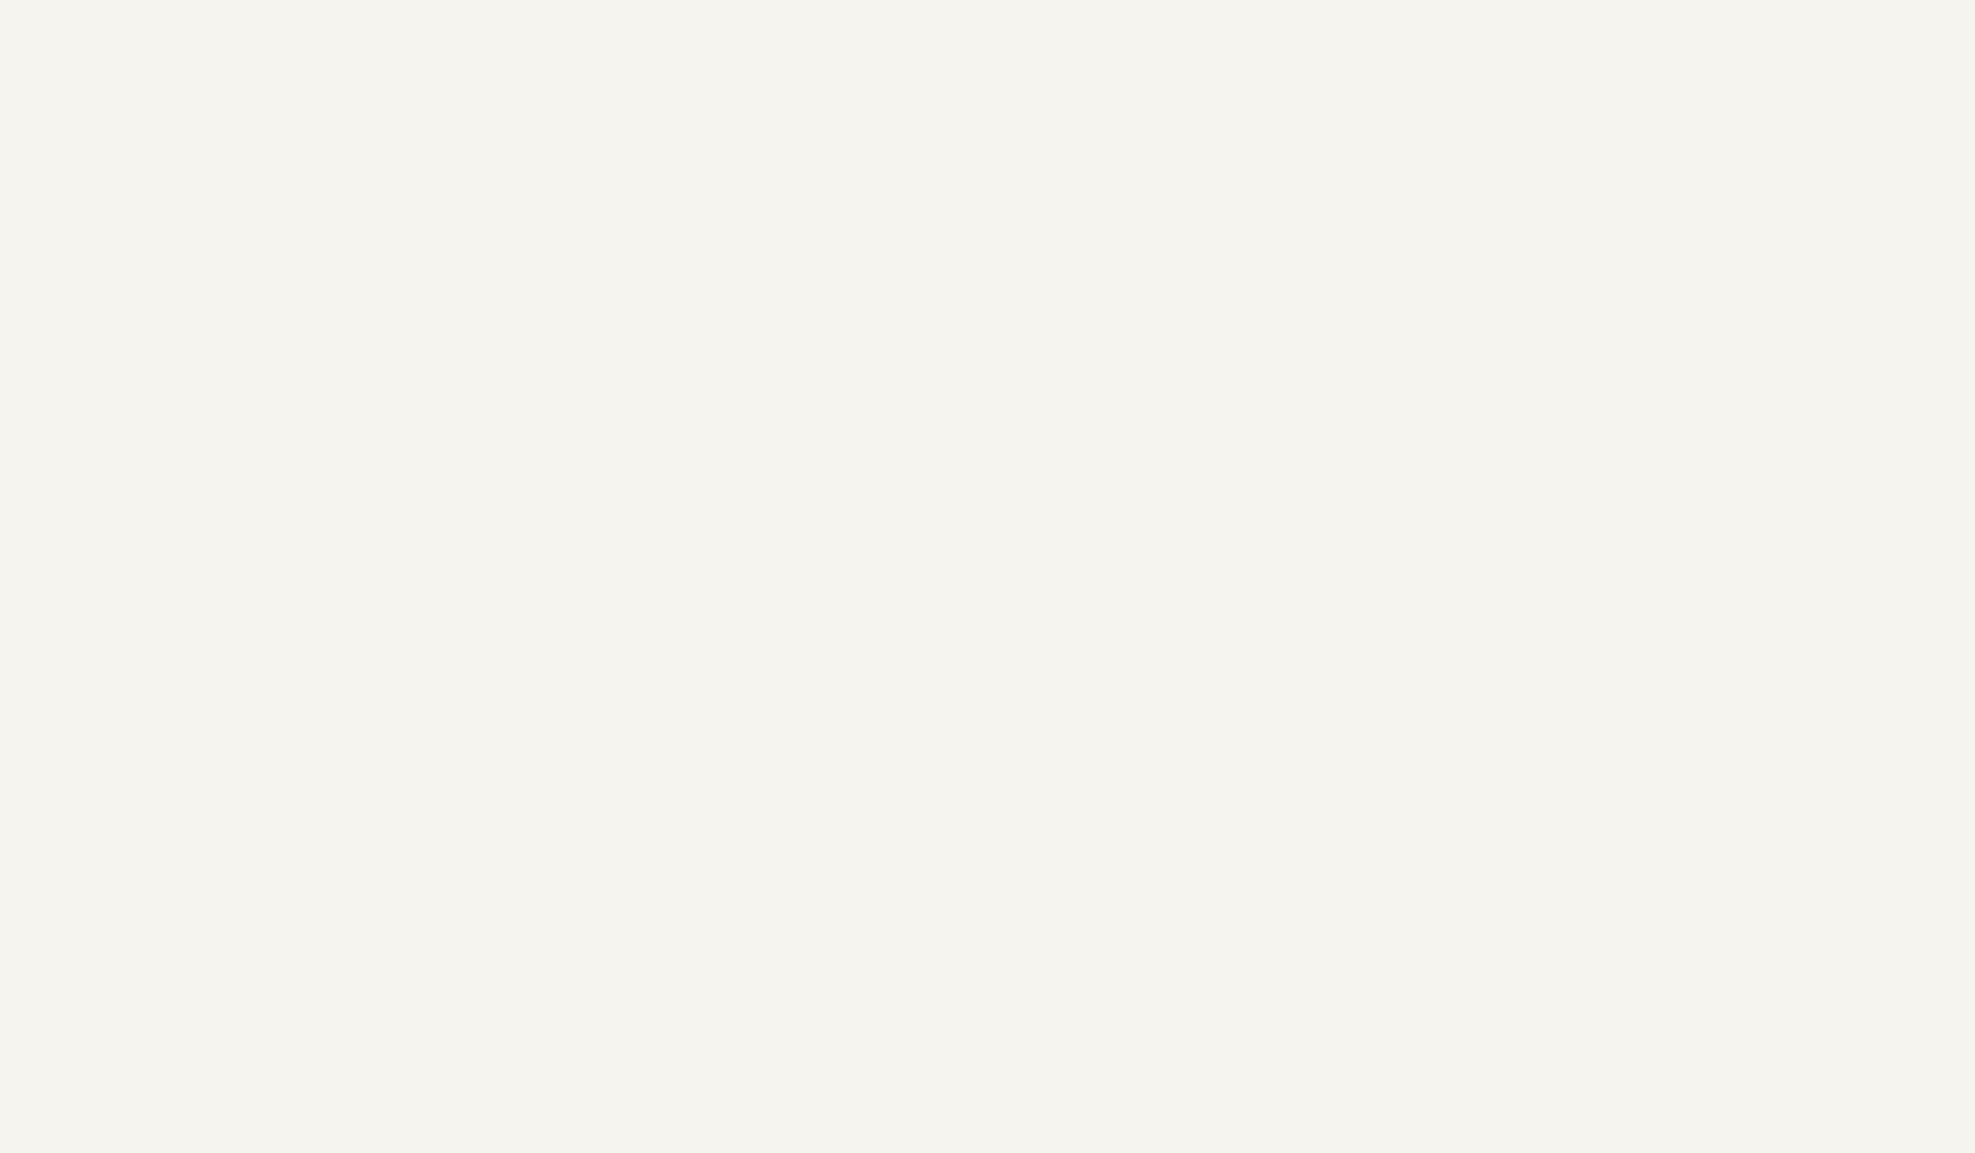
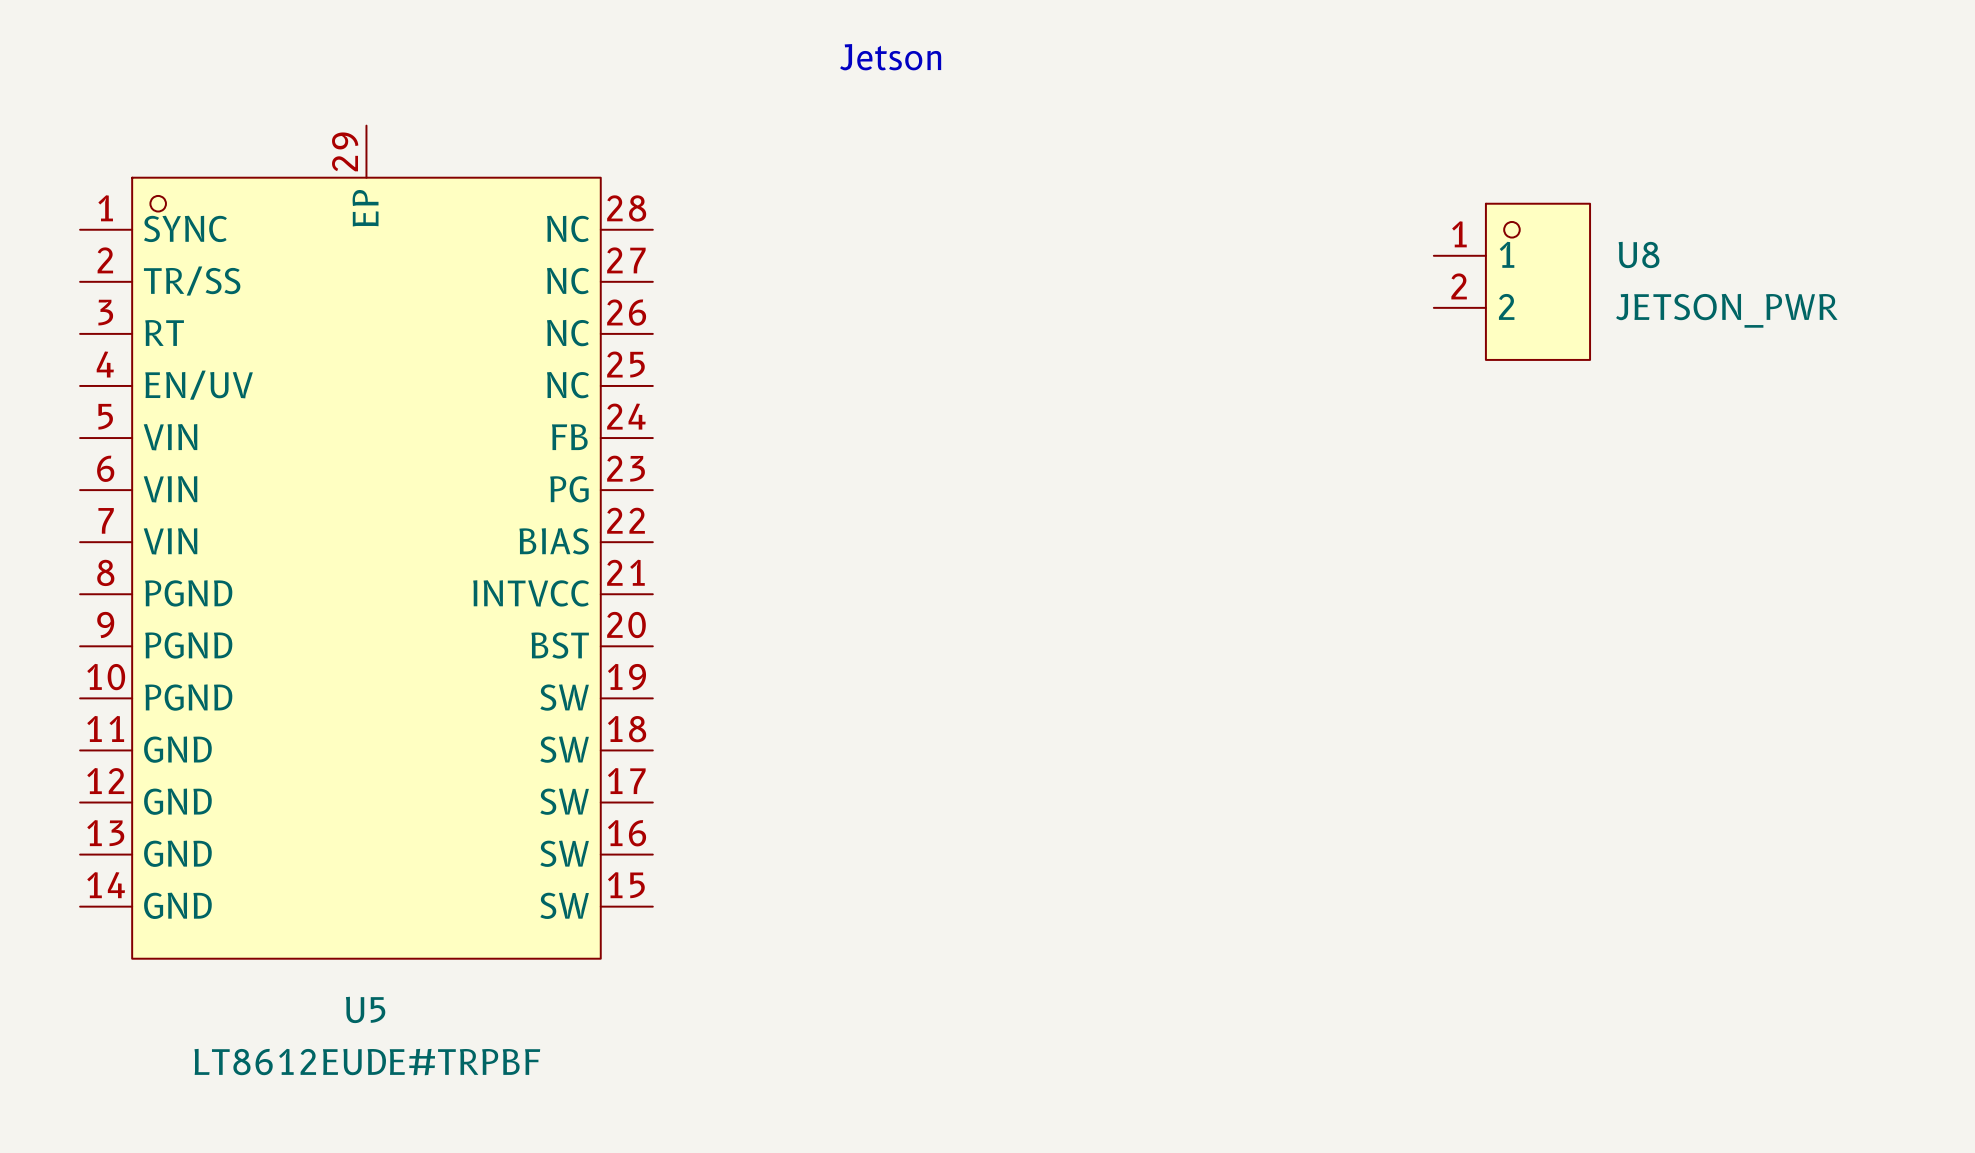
text: none -> Jetson (890, 57)
U8: none -> JETSON_PWR (1511, 281)
U5: none -> LT8612EUDE#TRPBF (366, 542)

